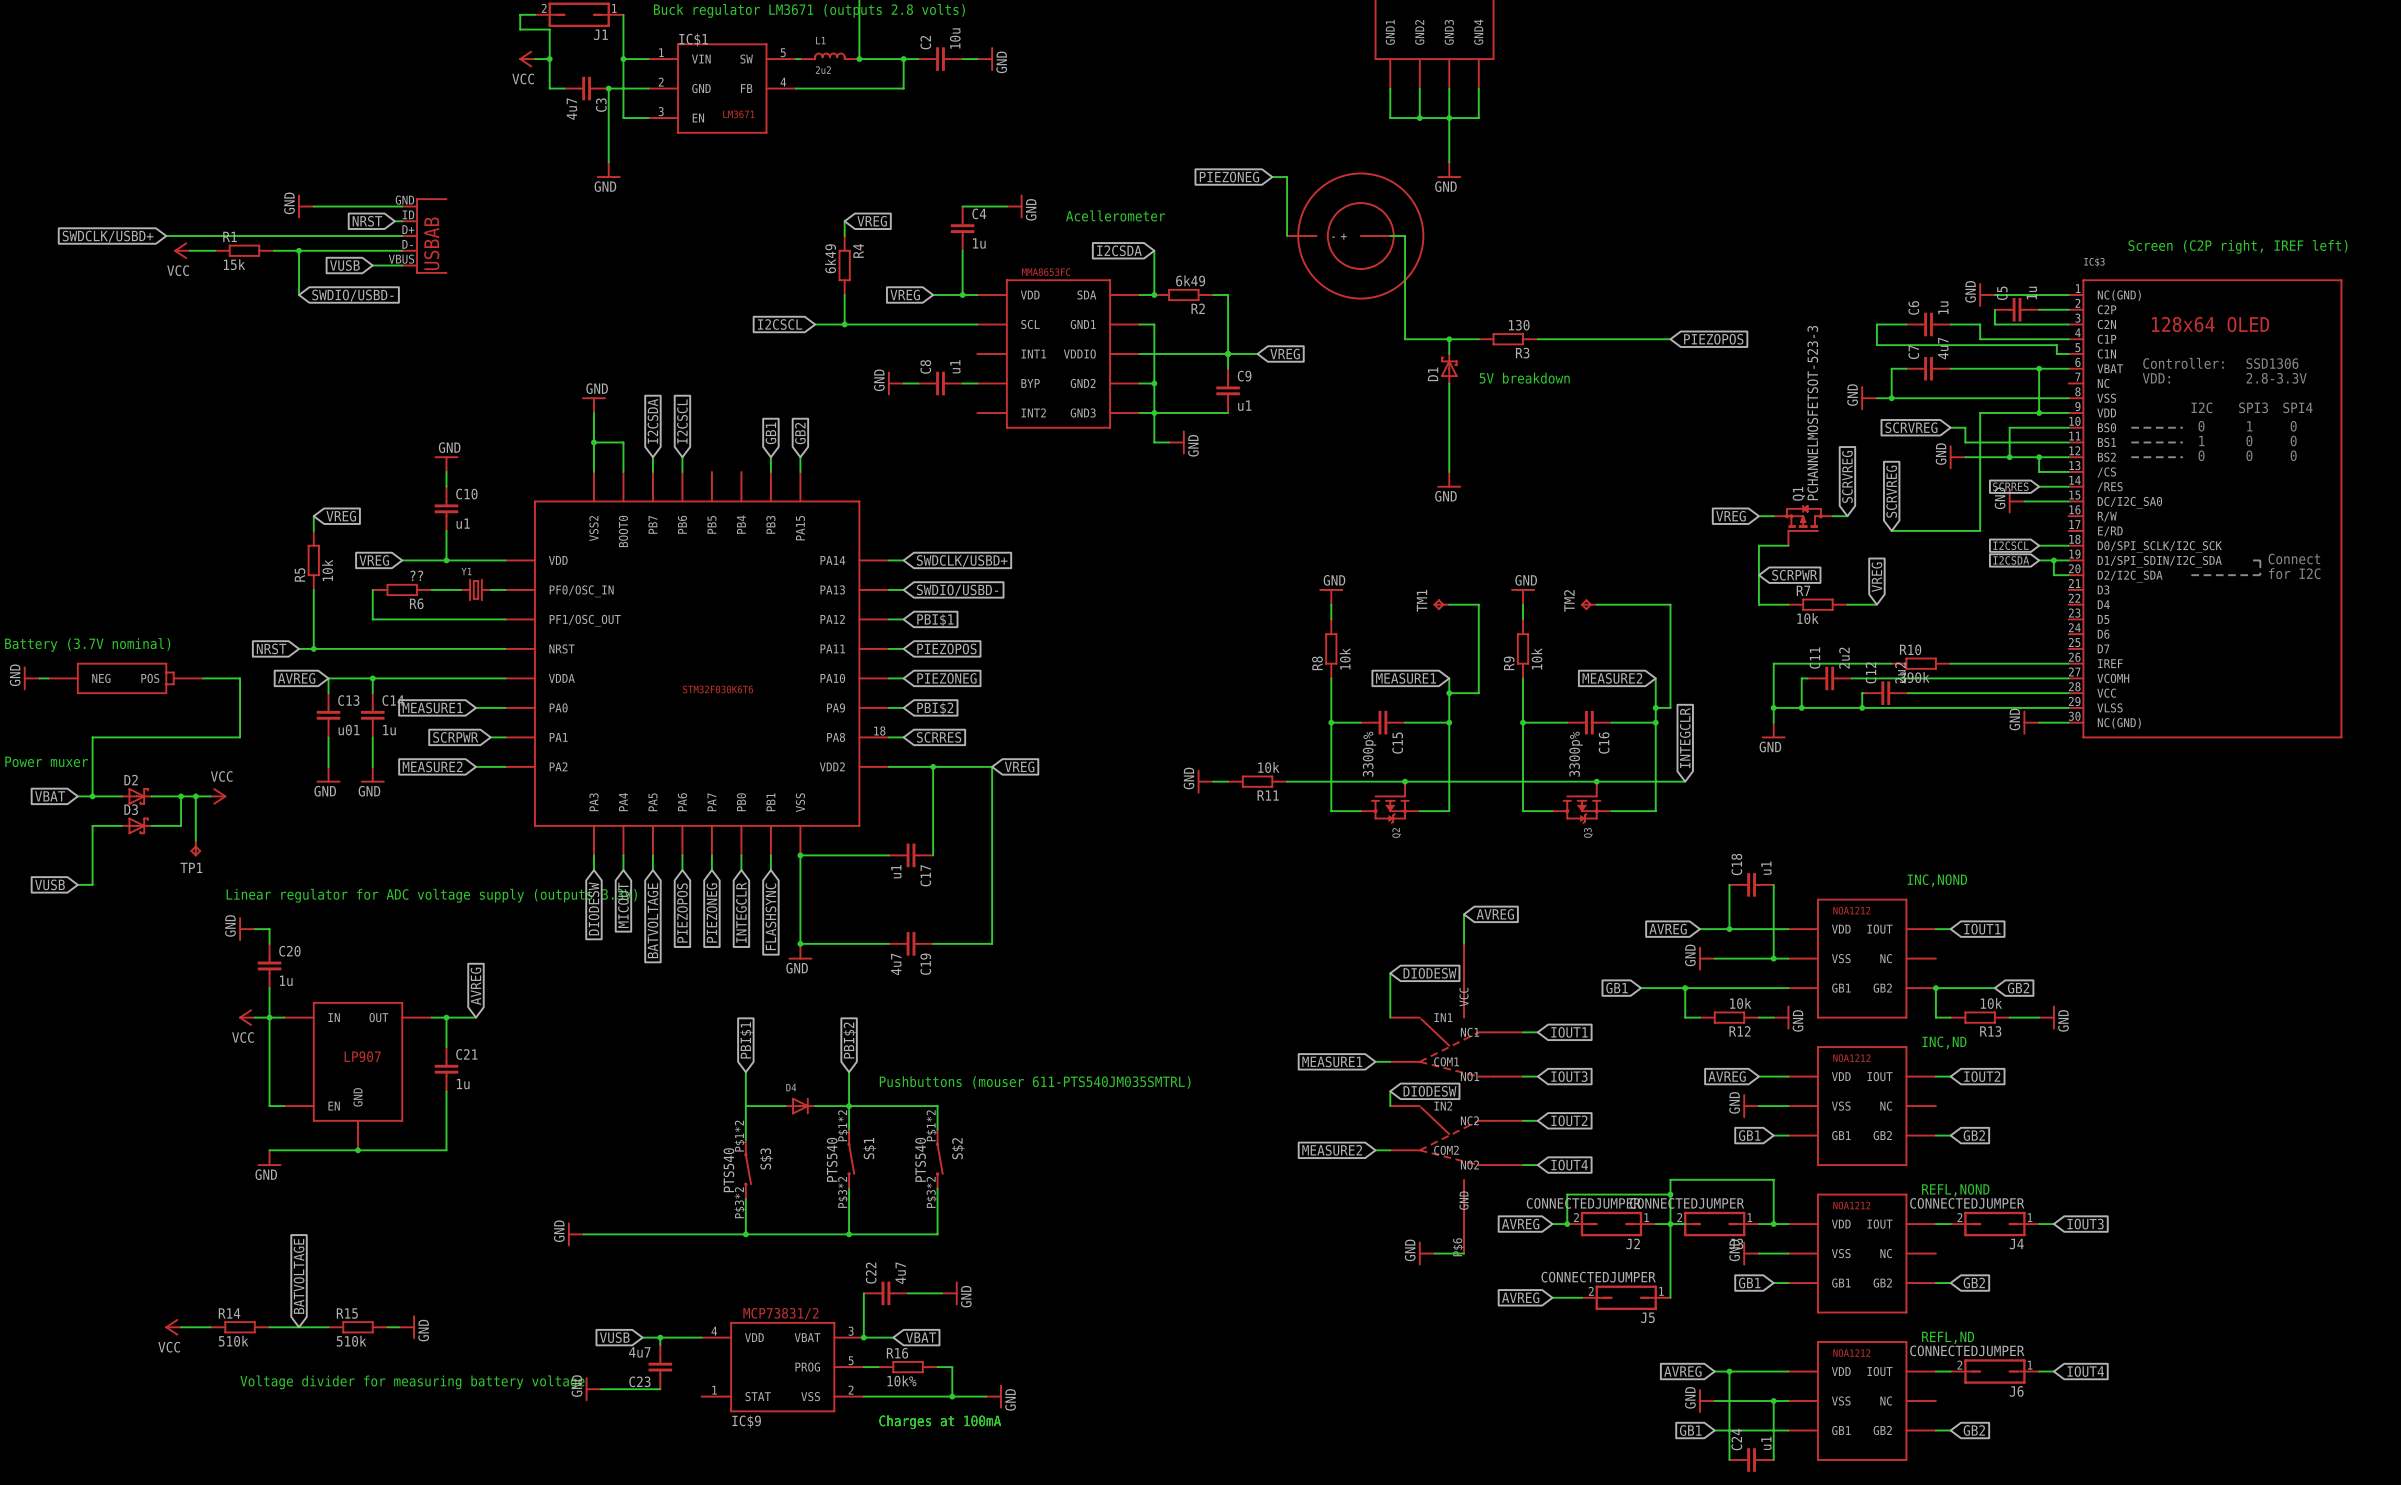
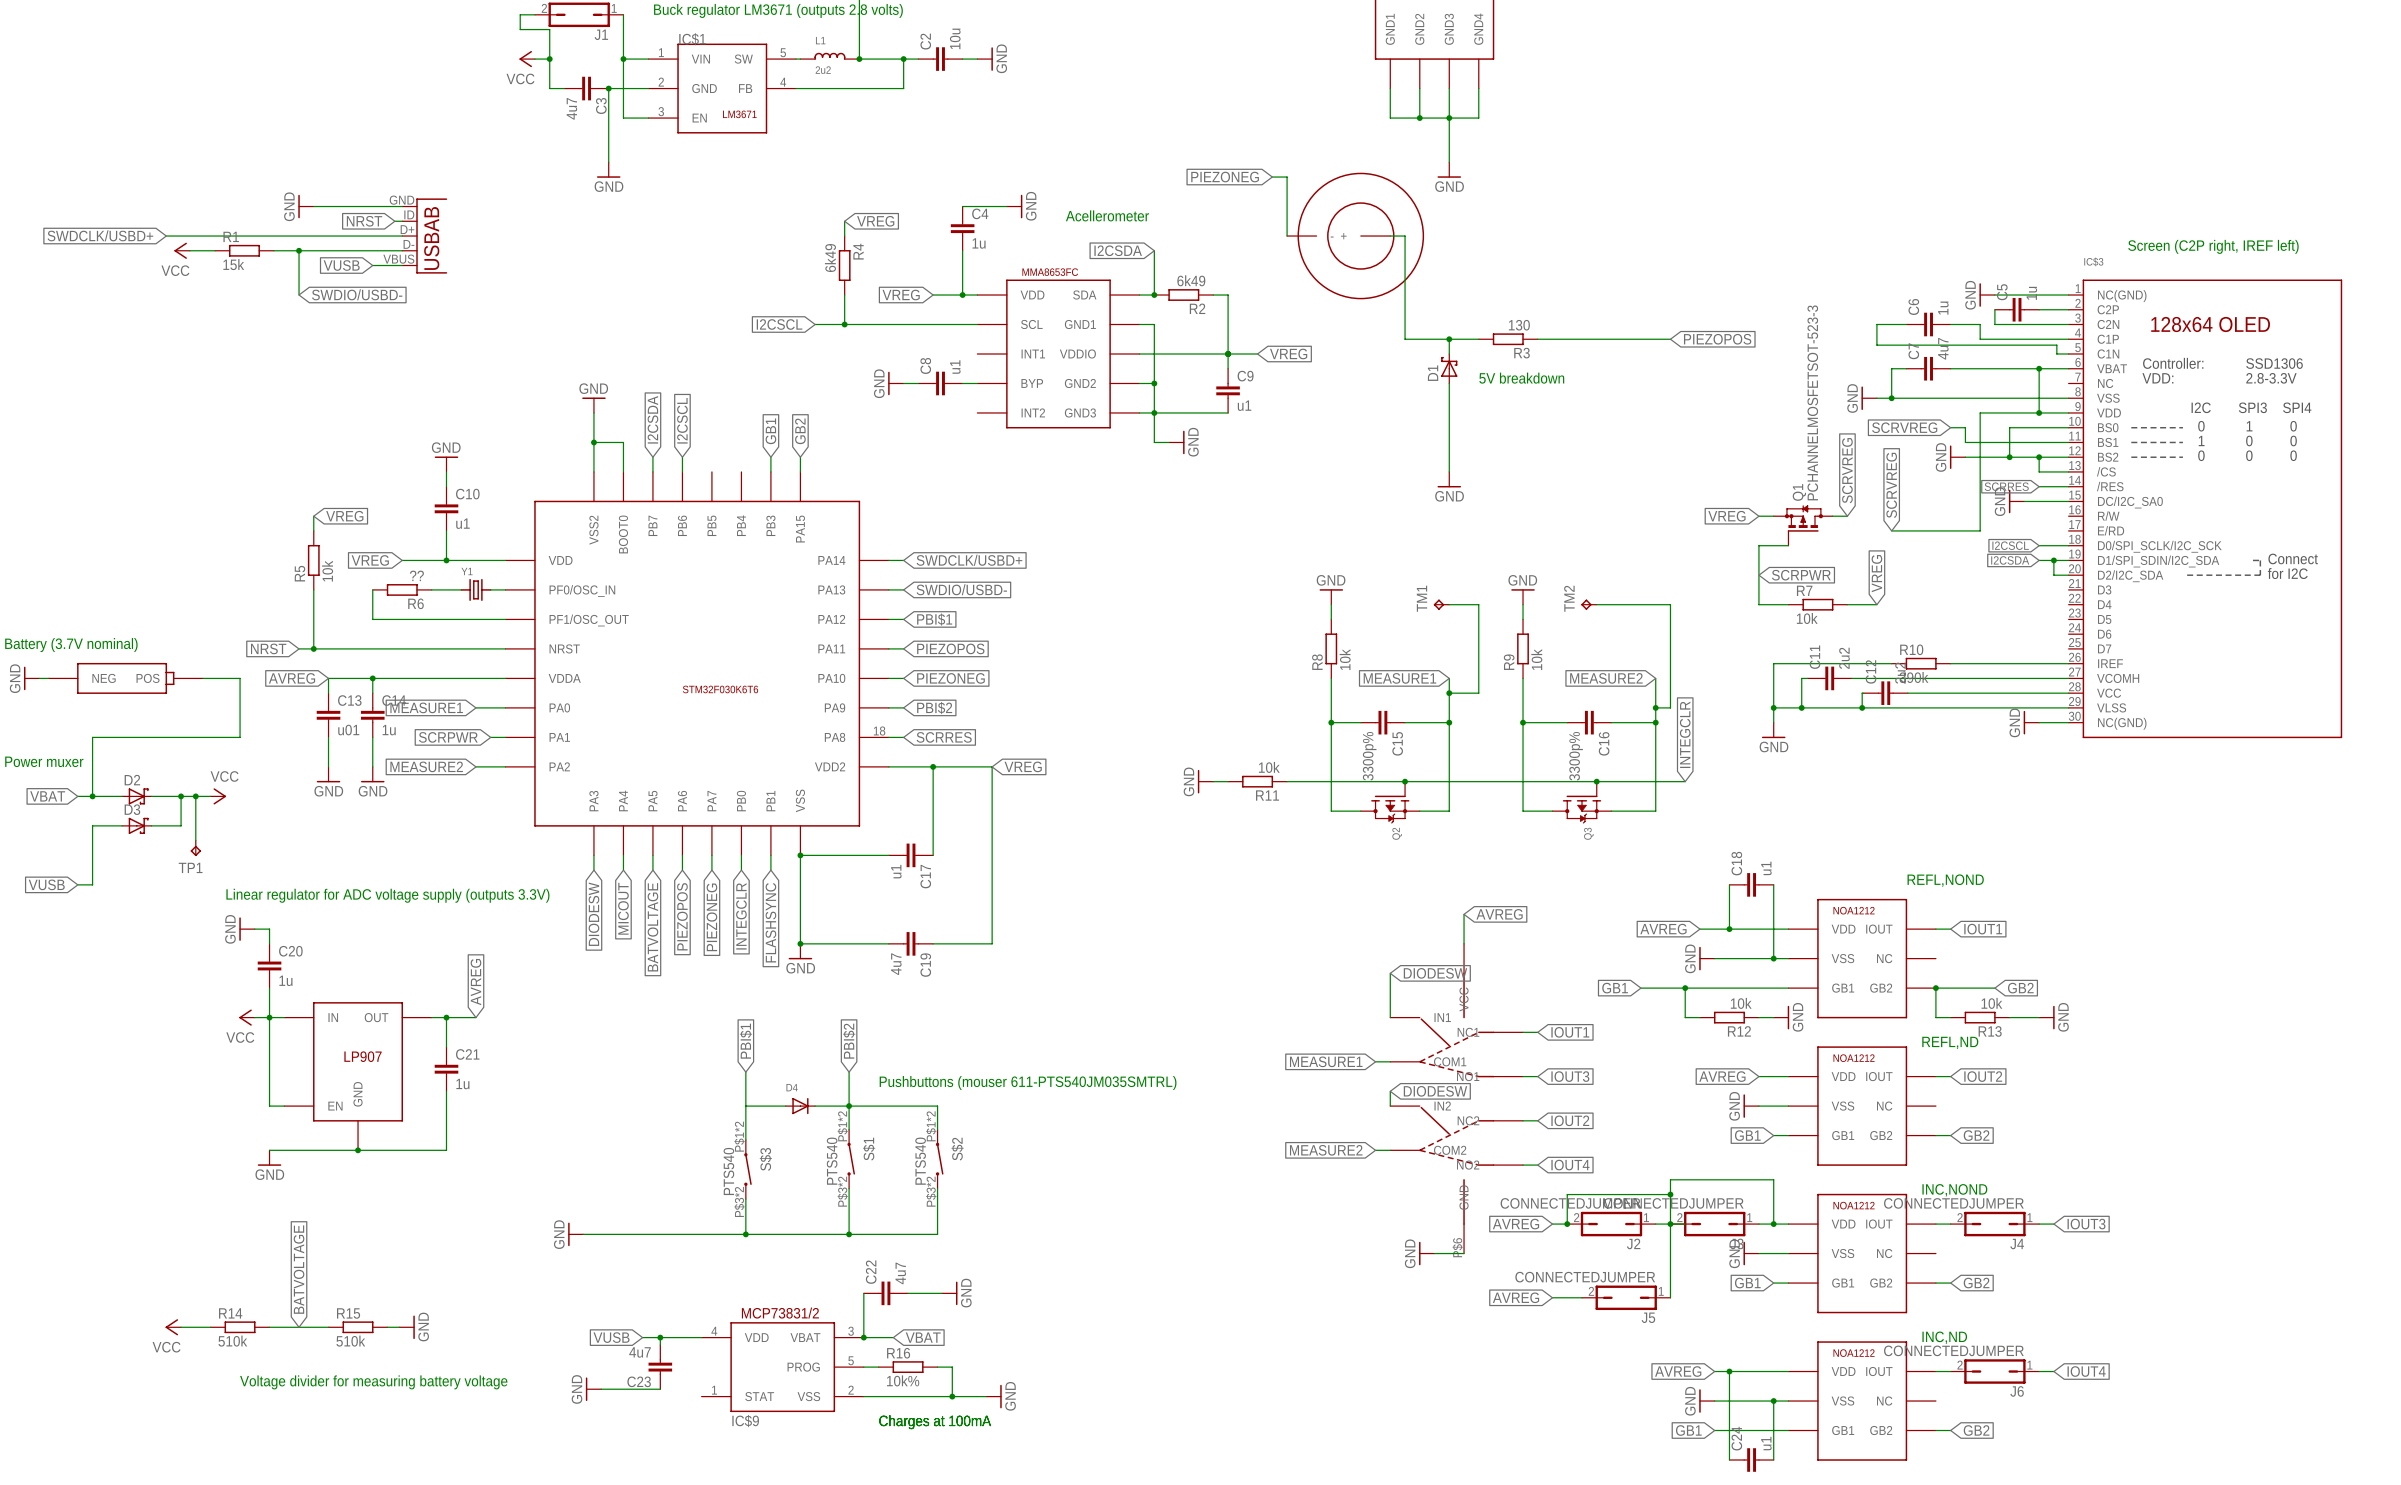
text: INC,NOND (1937, 880) -> REFL,NOND (1945, 880)
text: INC,ND (1944, 1042) -> REFL,ND (1950, 1042)
text: REFL,NOND (1955, 1190) -> INC,NOND (1954, 1190)
text: REFL,ND (1948, 1337) -> INC,ND (1944, 1337)

